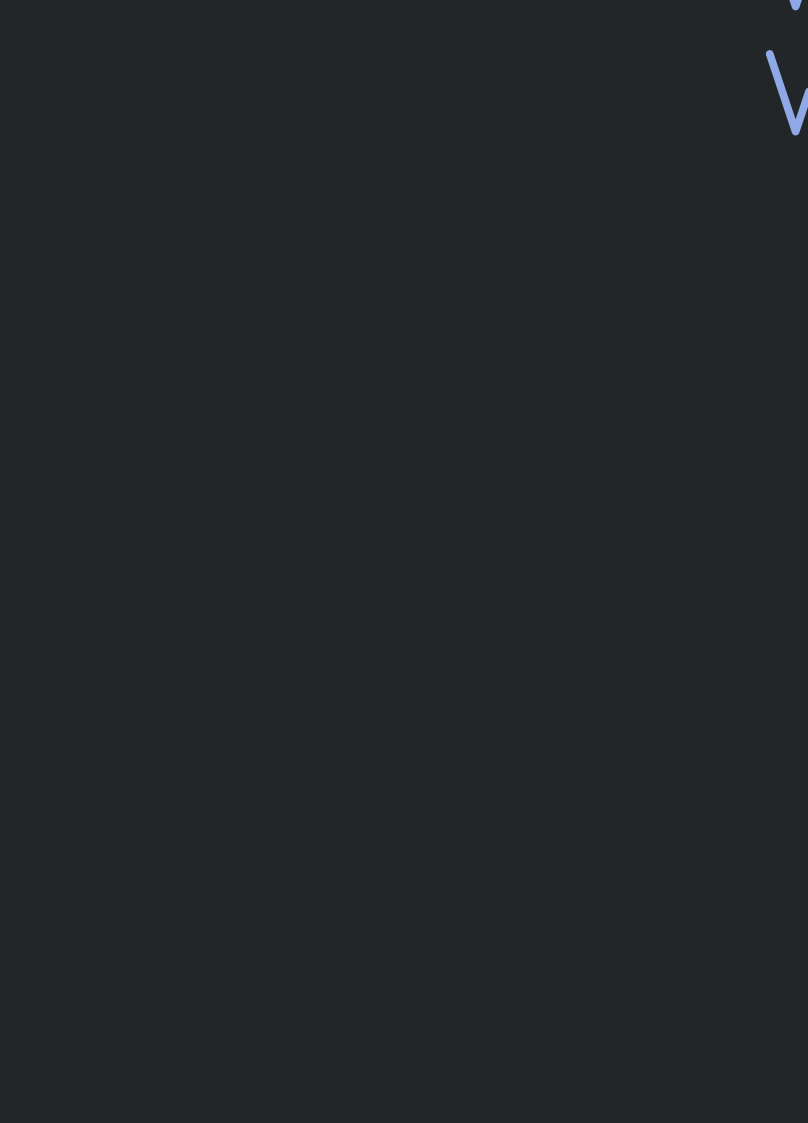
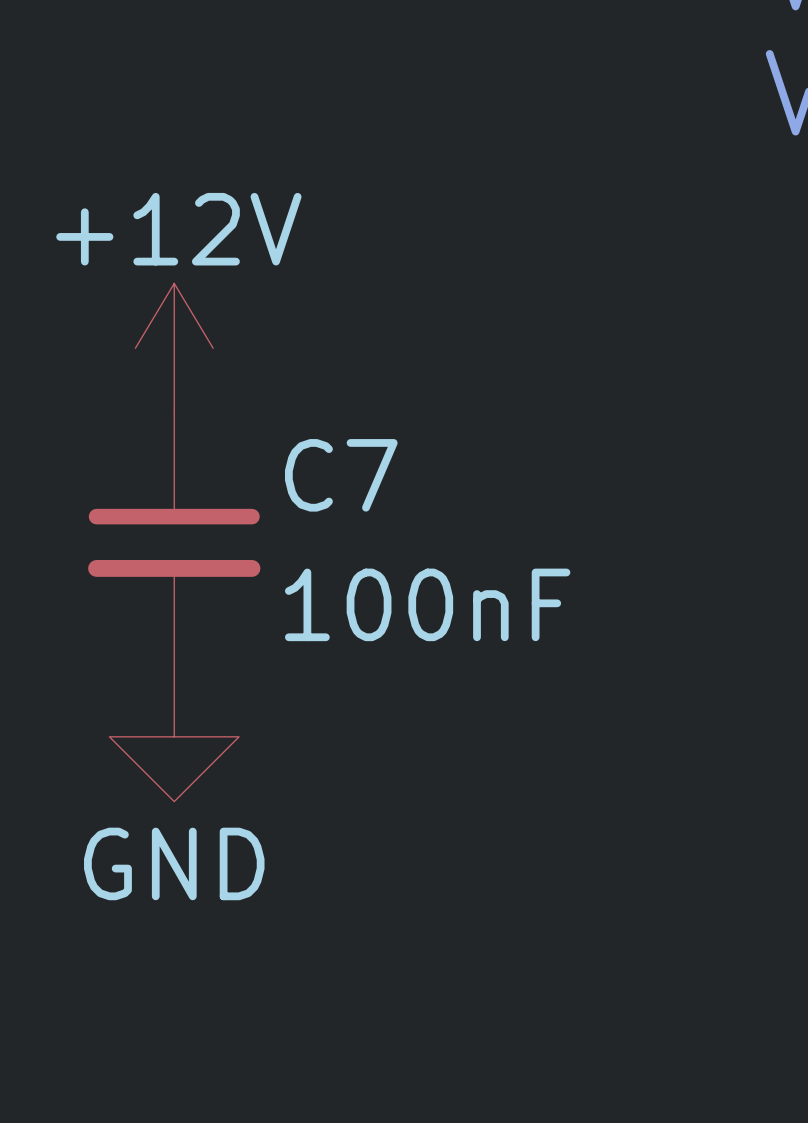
power symbol: none -> +12V (174, 348)
C7: none -> 100nF (174, 542)
power symbol: none -> GND (174, 736)

